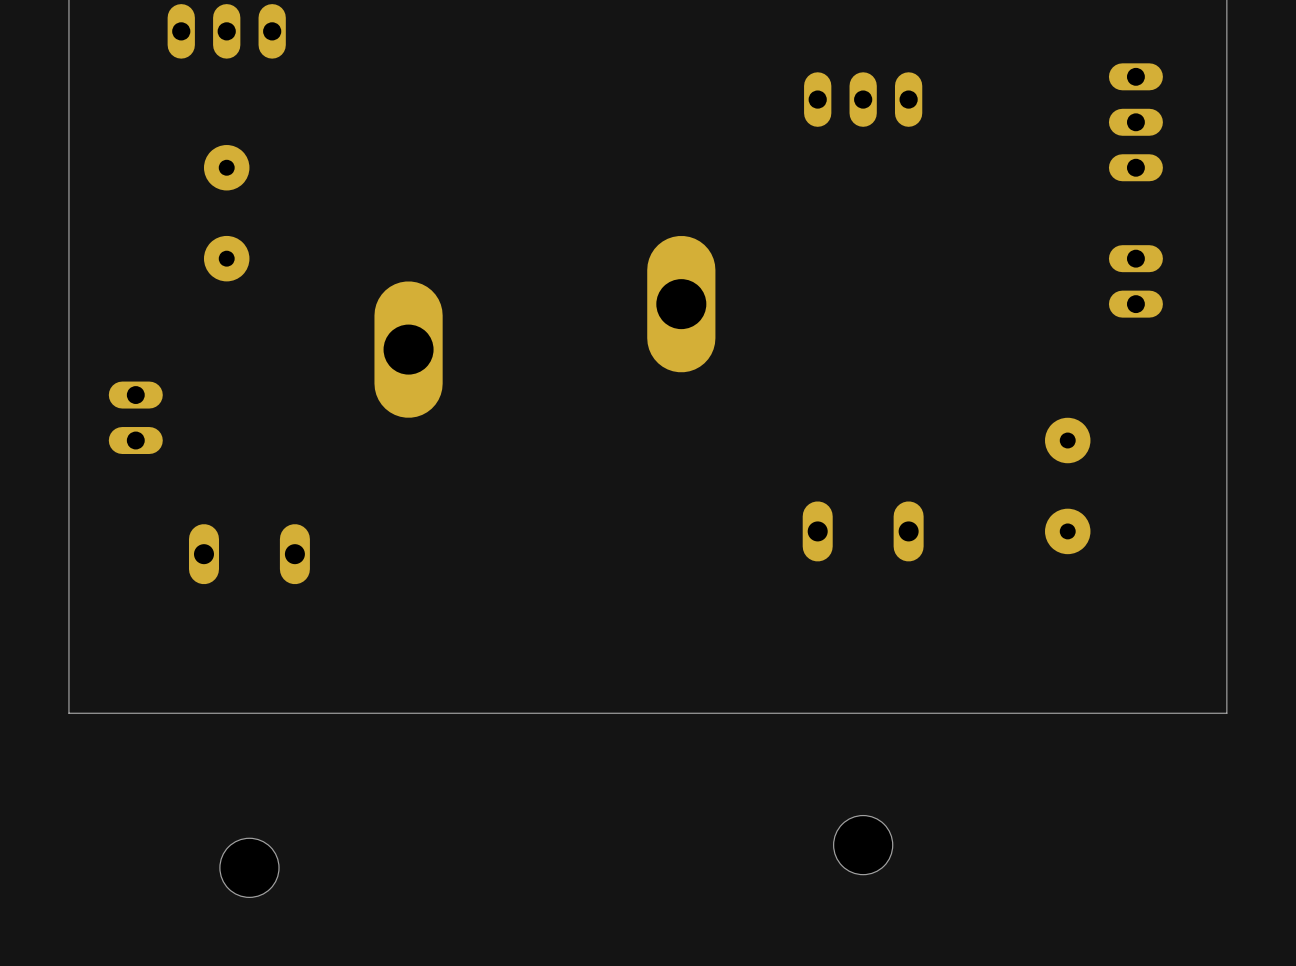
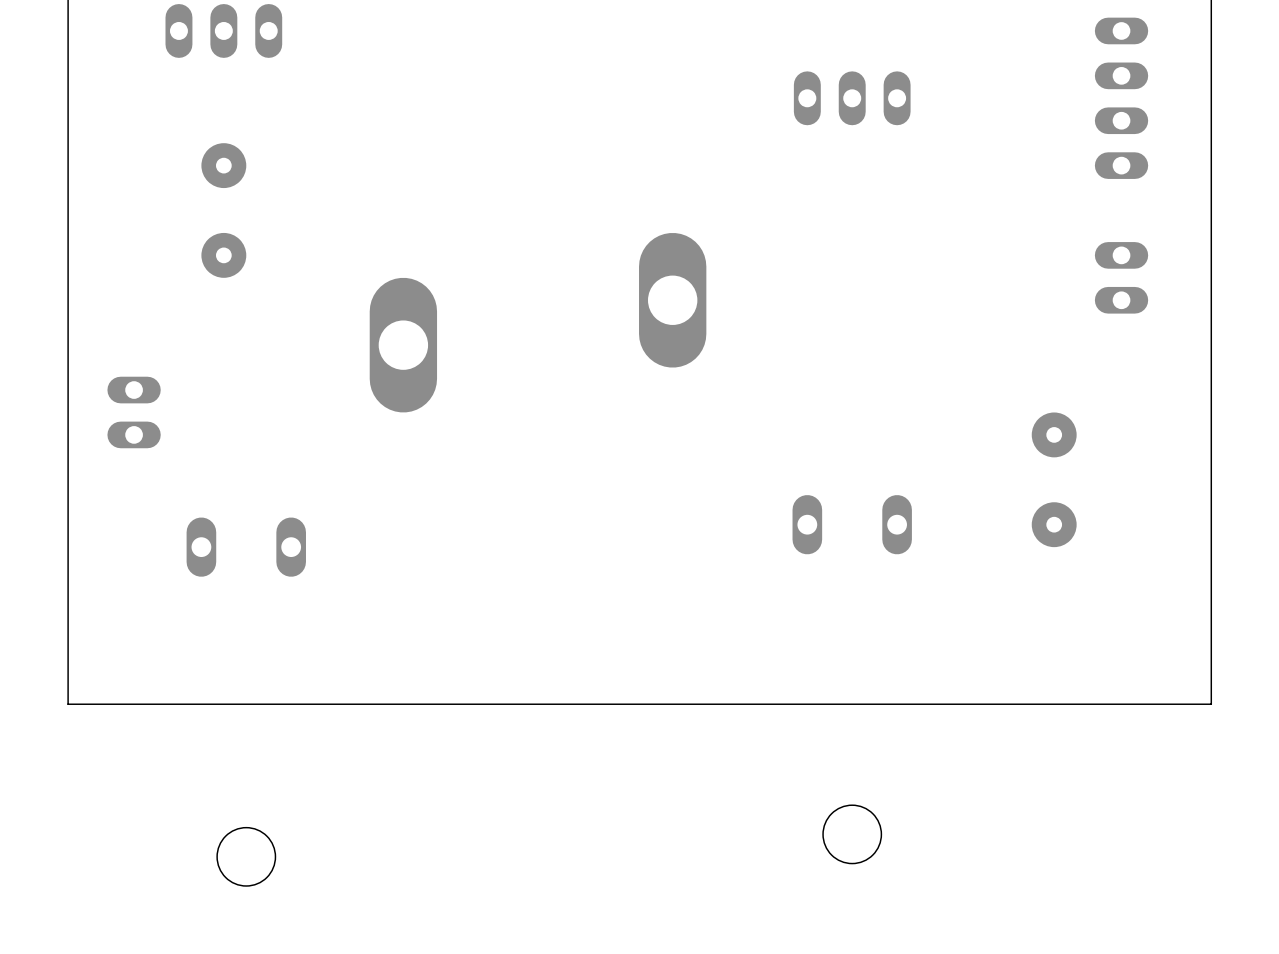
part: none -> (1121, 98)

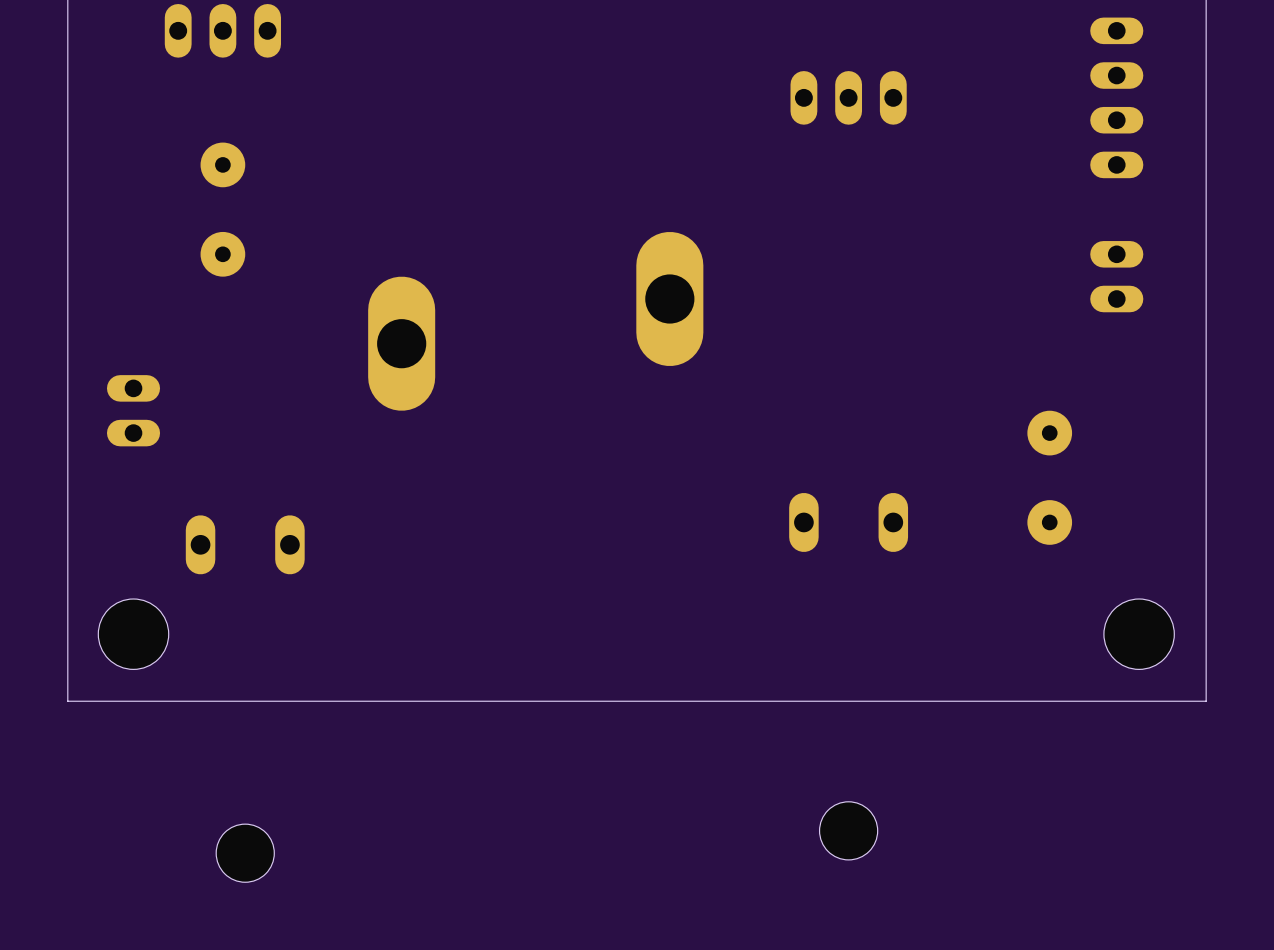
hole: none -> (133, 634)
hole: none -> (1139, 634)

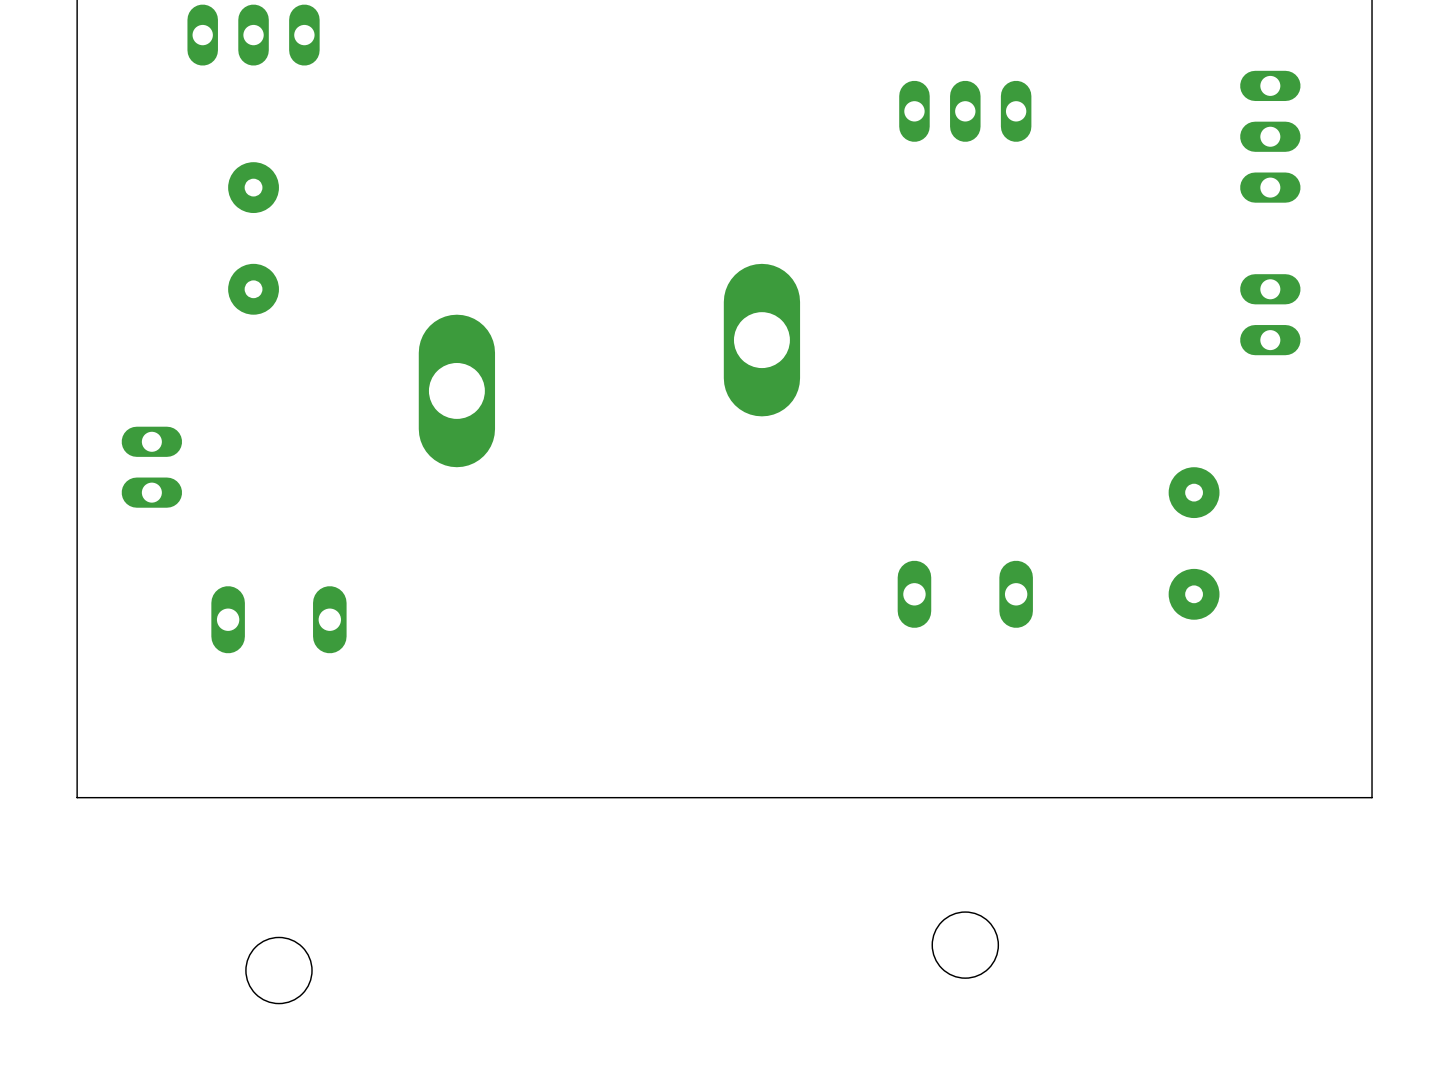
part: (1116, 97) -> none
hole: (133, 634) -> none
hole: (1139, 634) -> none

